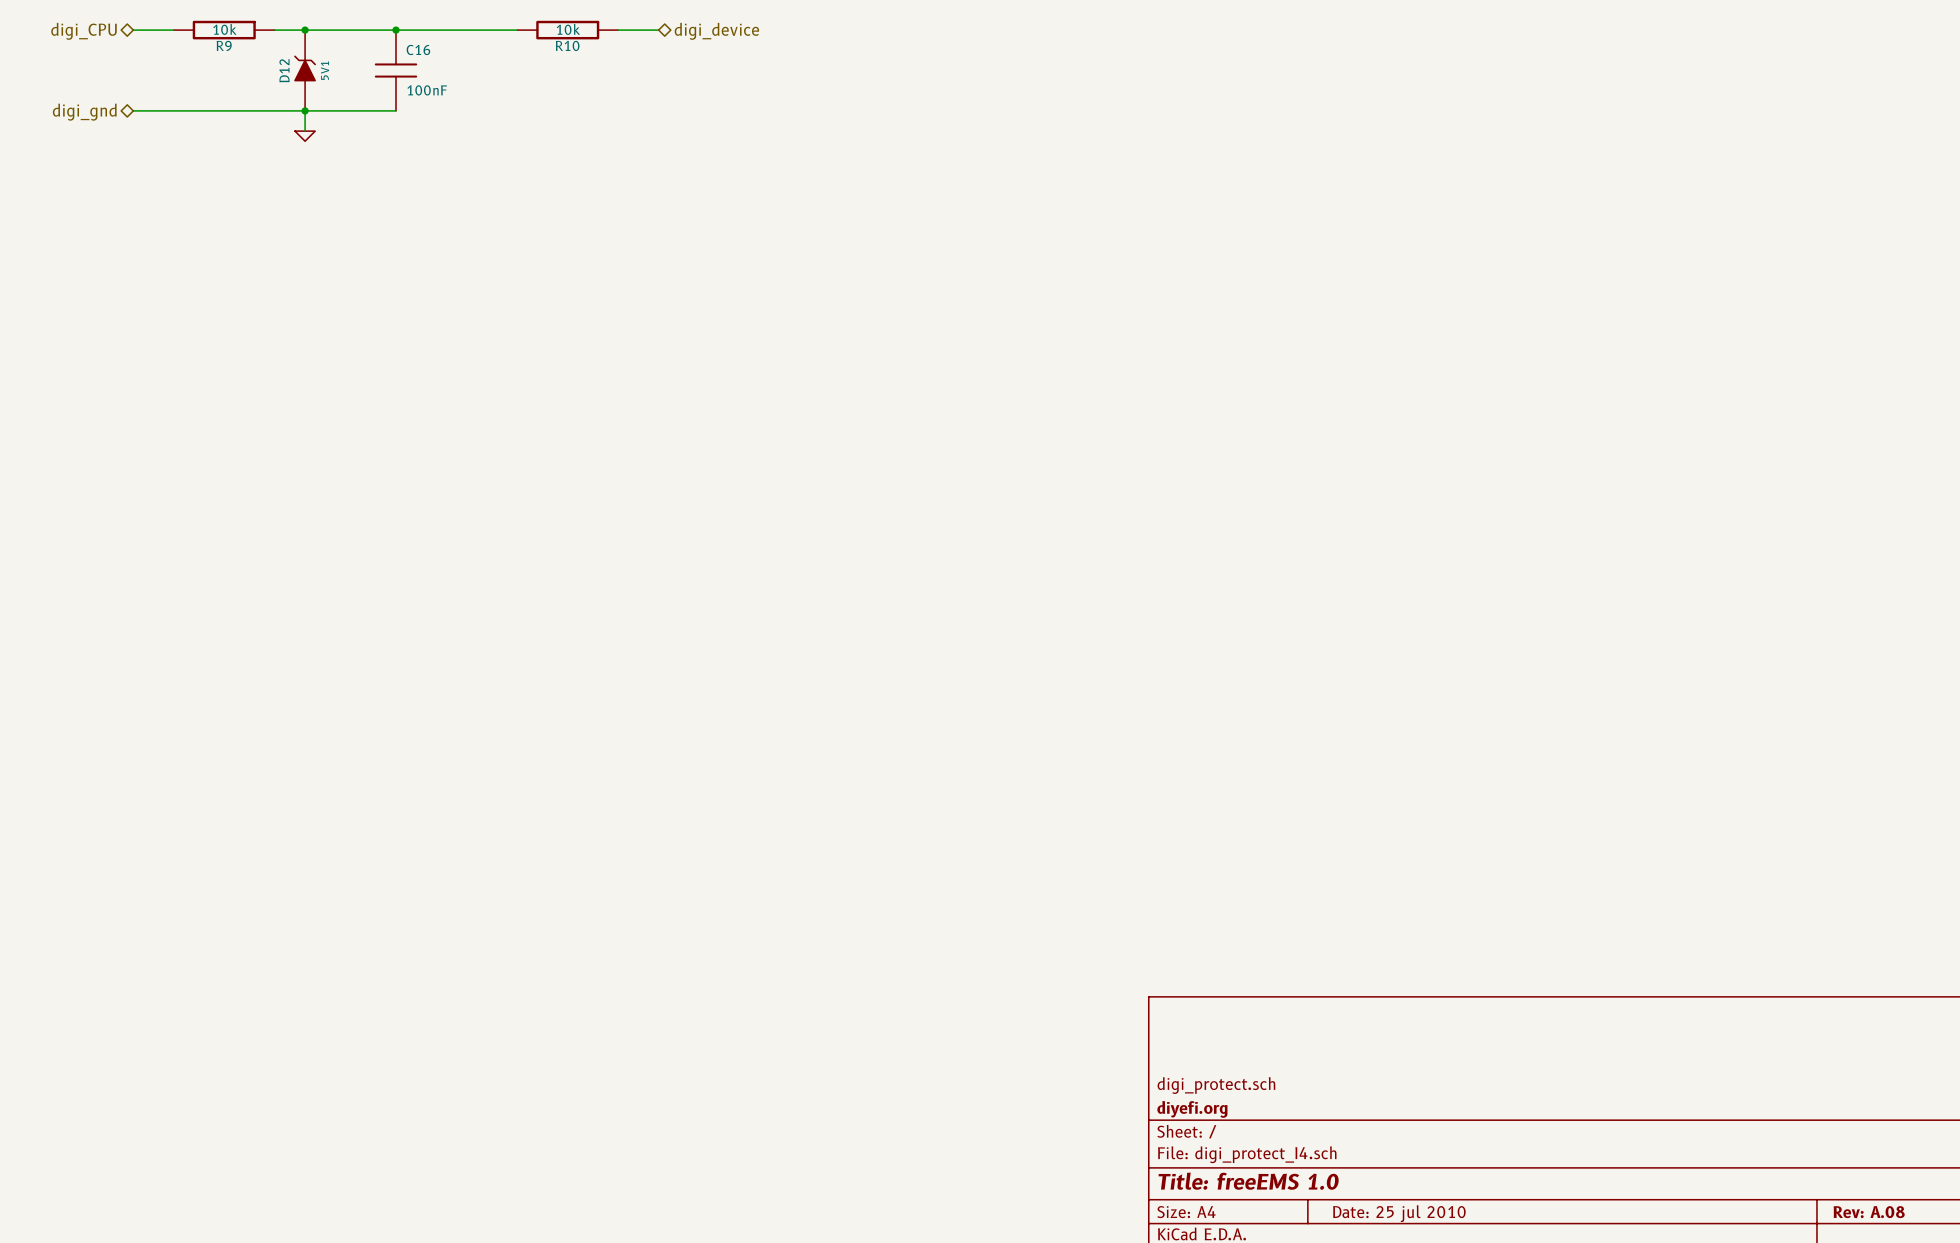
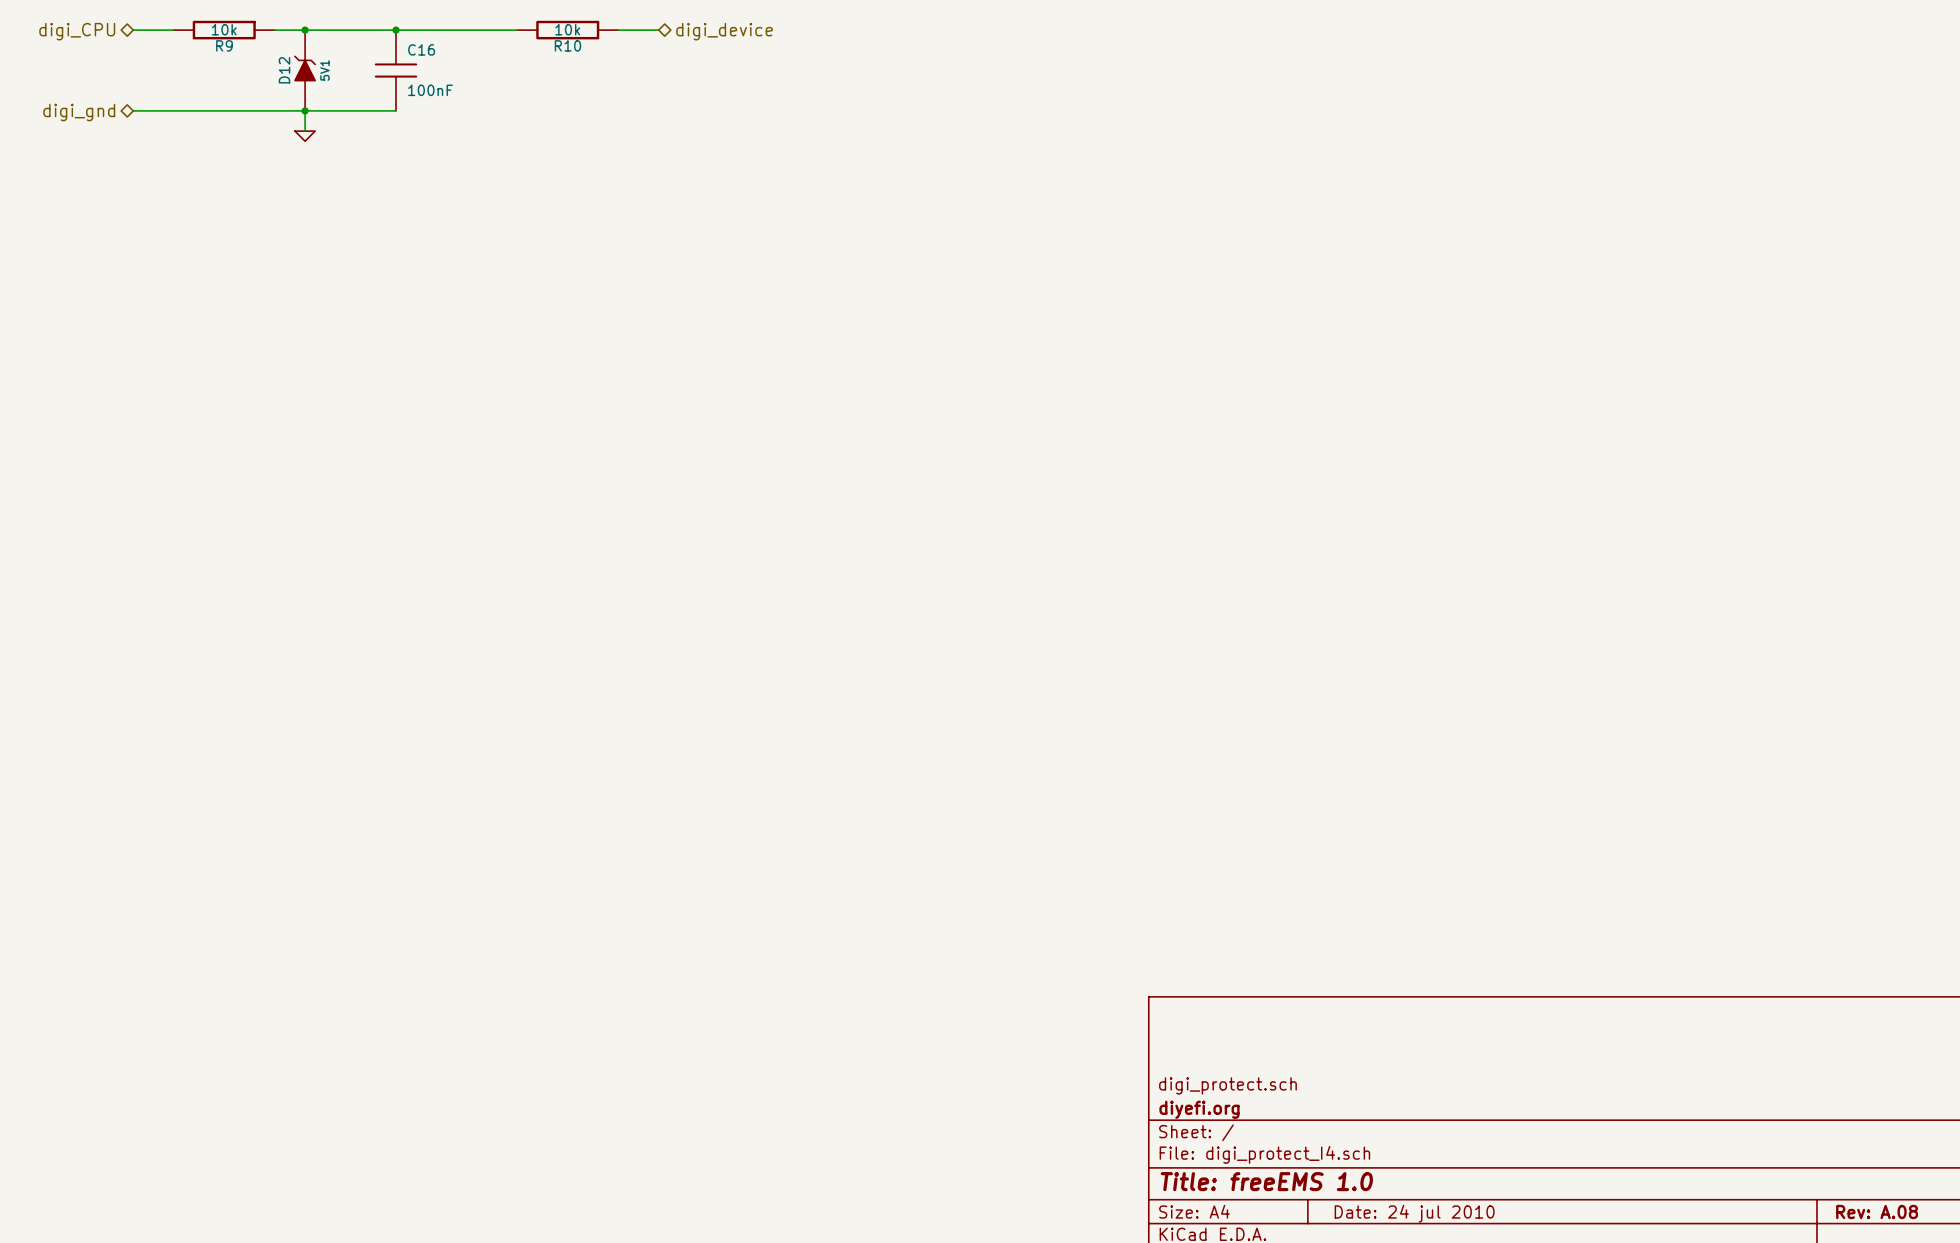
title block: Date: 25 jul 2010 (1399, 1213) -> Date: 24 jul 2010 (1414, 1213)

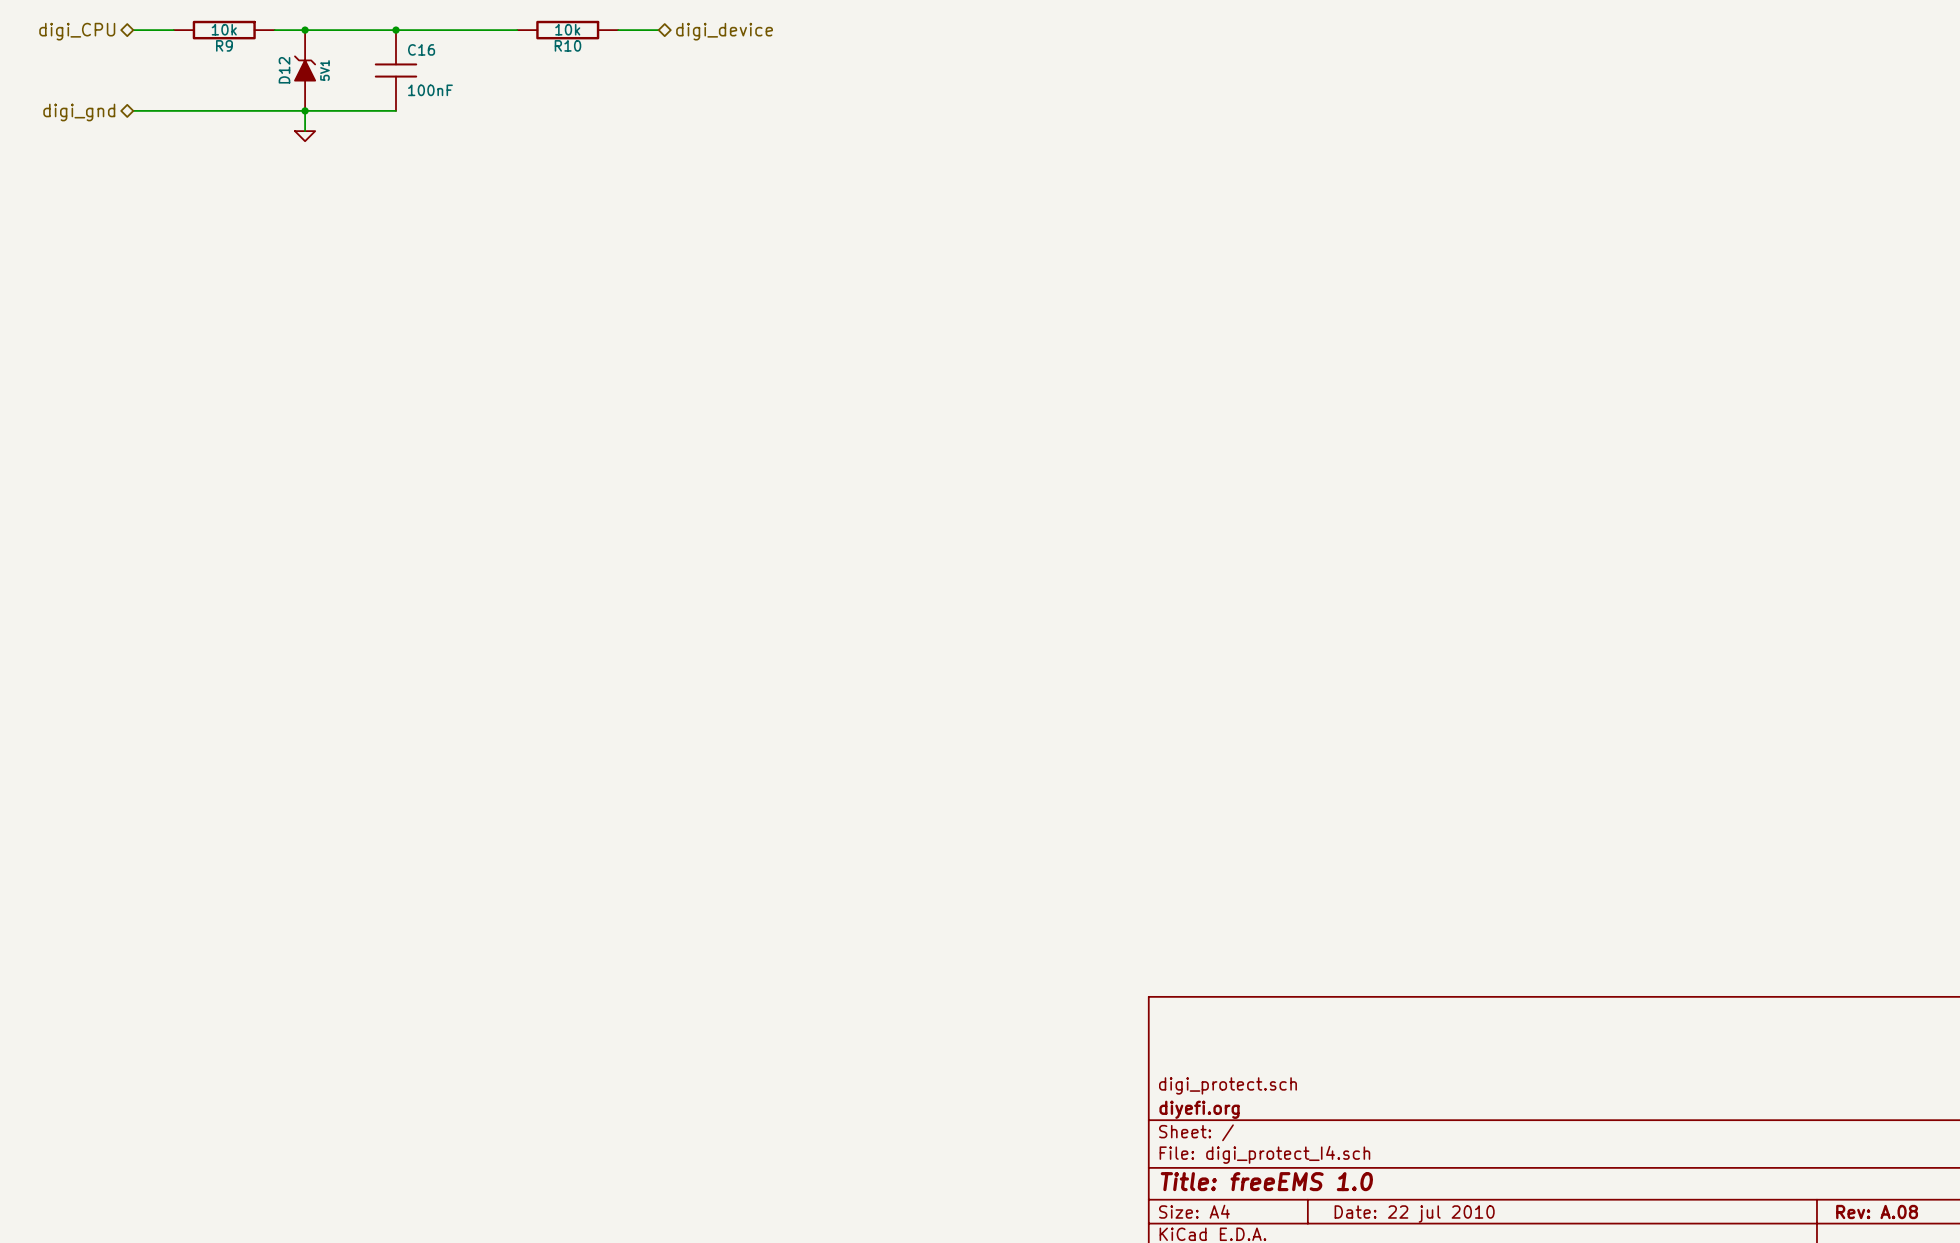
title block: Date: 24 jul 2010 (1414, 1213) -> Date: 22 jul 2010 (1414, 1213)

